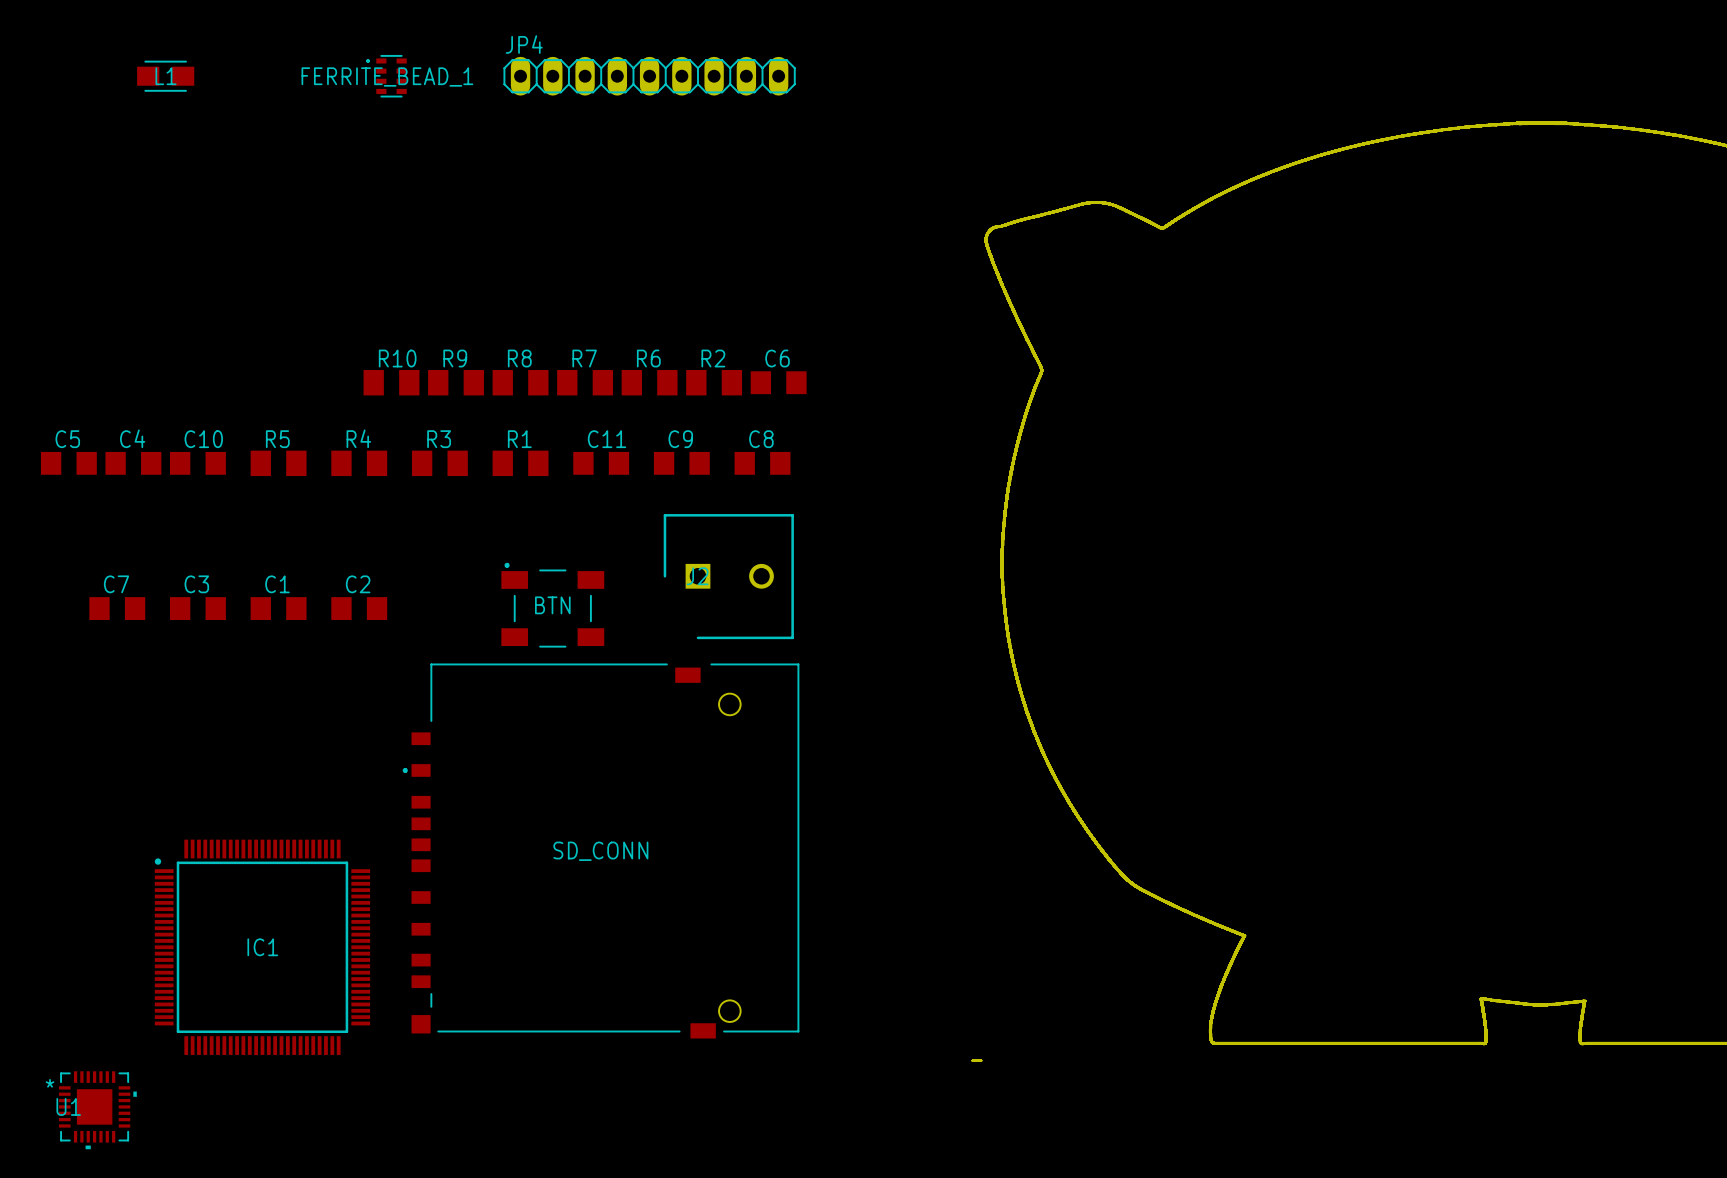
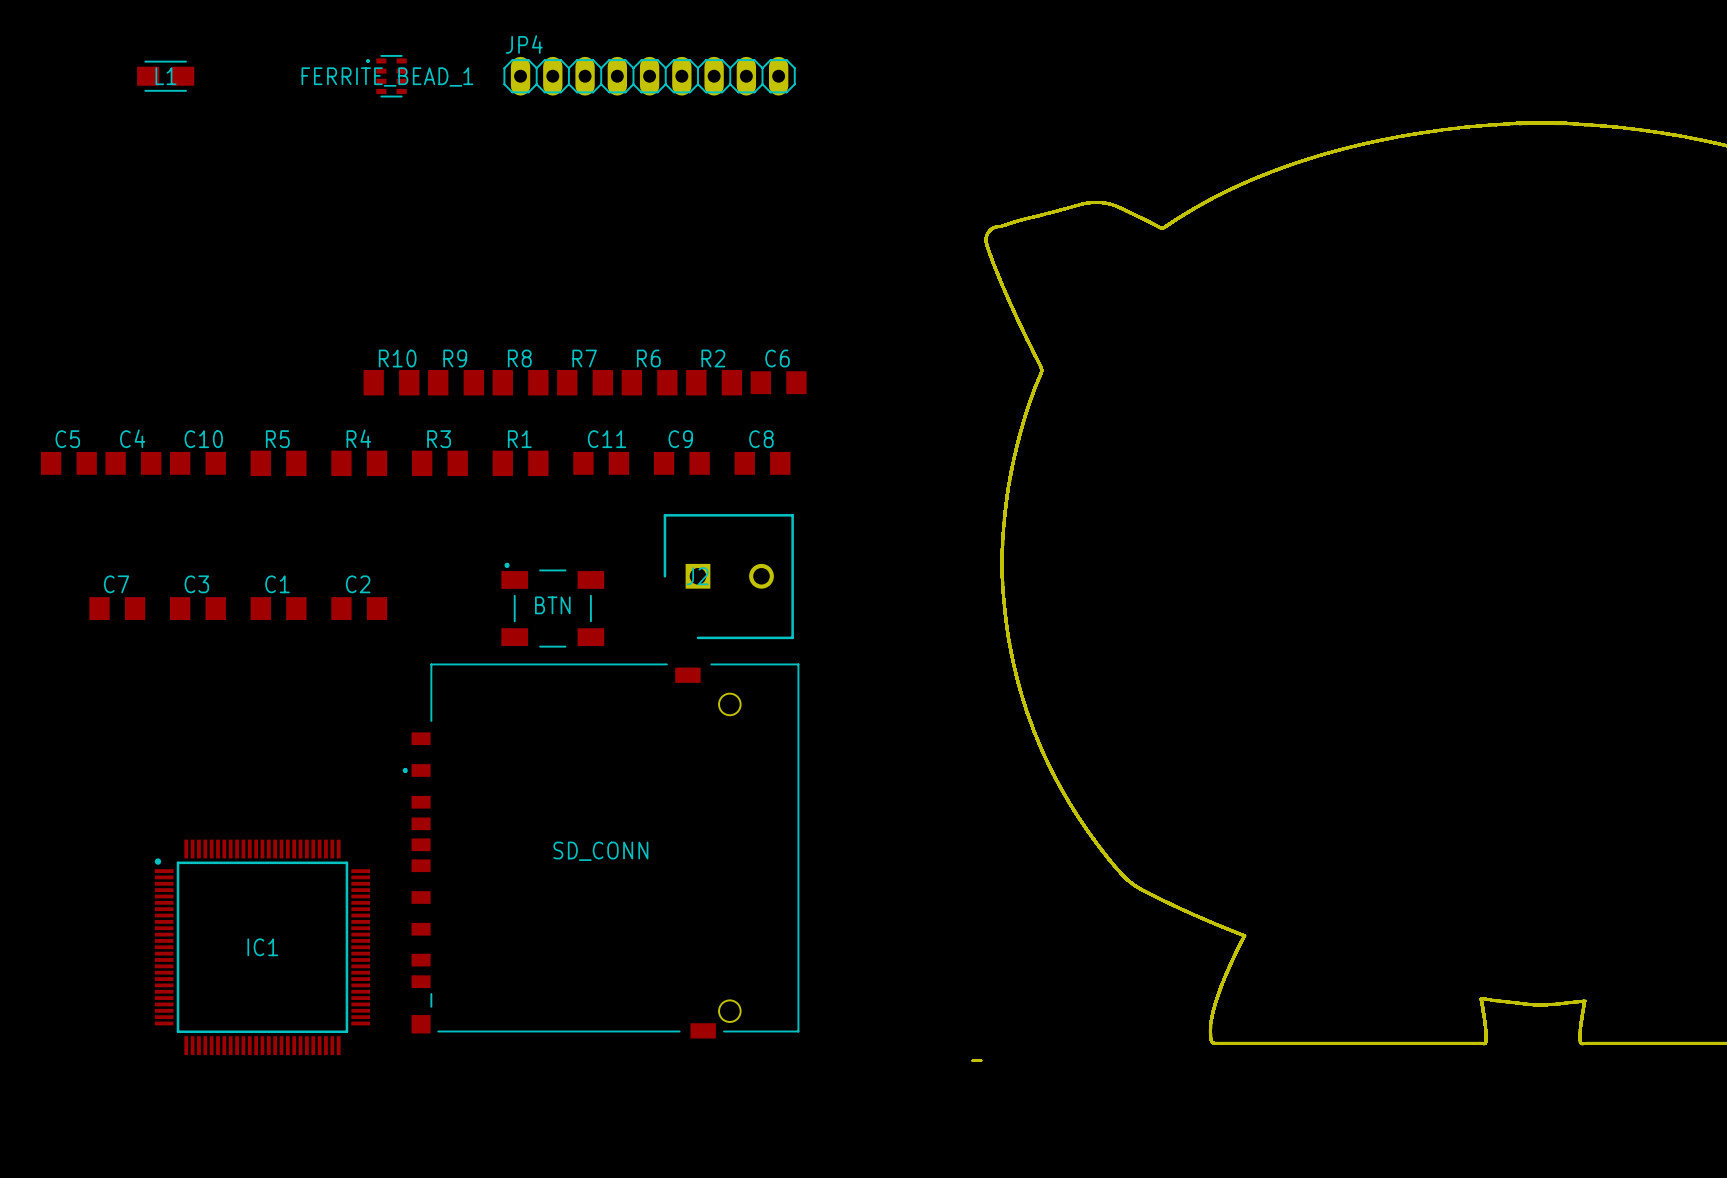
U1: (97, 1110) -> none

